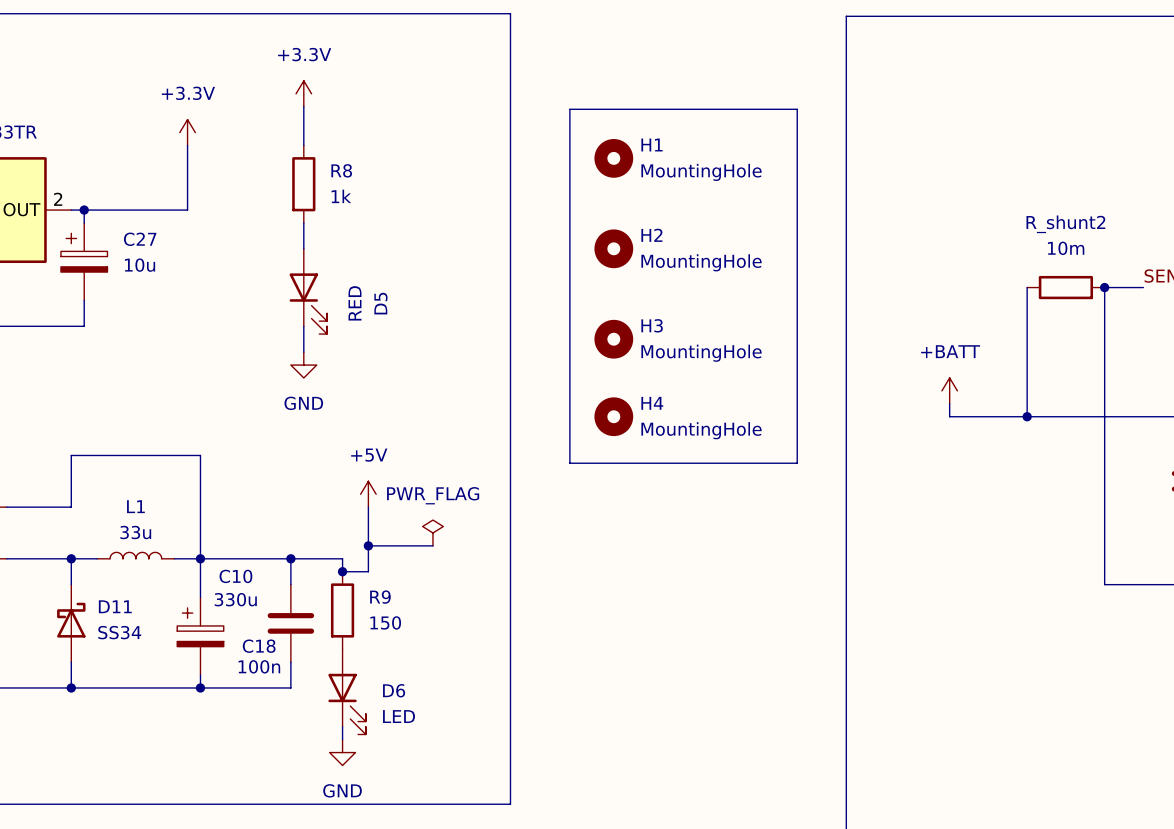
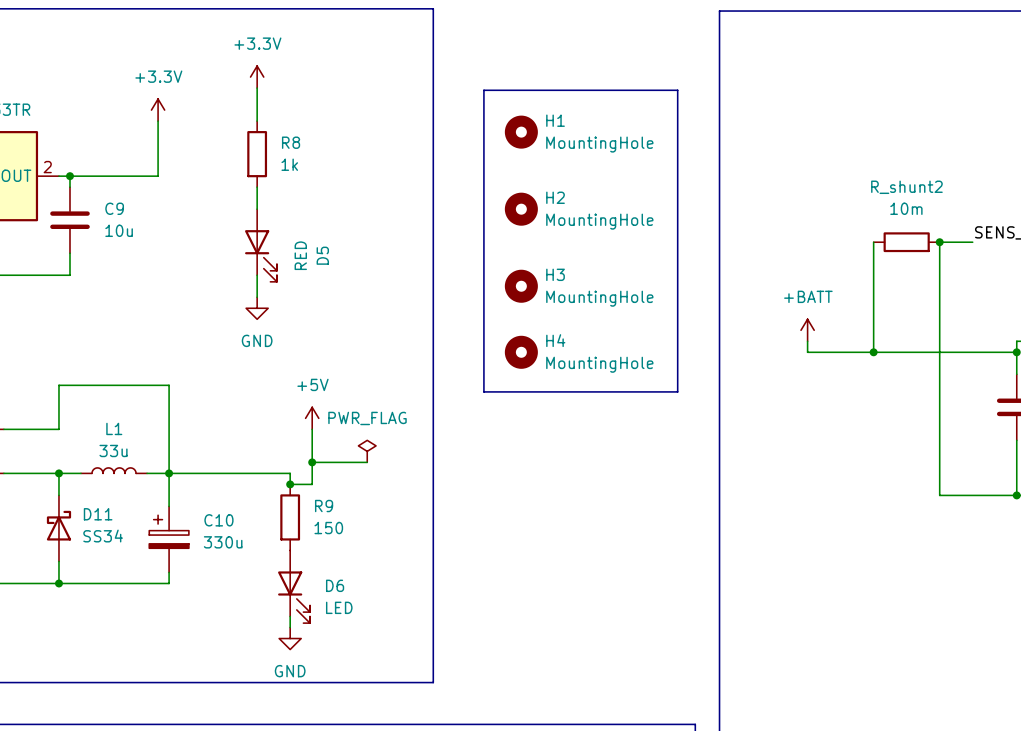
C27: 10u (84, 261) -> none
C9: none -> 10u (69, 220)
wire: (290, 558) (290, 584) -> none
junction: (290, 558) -> none
C10 name position: C10 (235, 576) -> C10 (218, 520)
C10 value position: 330u (235, 599) -> 330u (223, 542)
C18: 100n (290, 623) -> none
wire: (290, 662) (290, 687) (200, 687) -> none
junction: (200, 687) -> none

